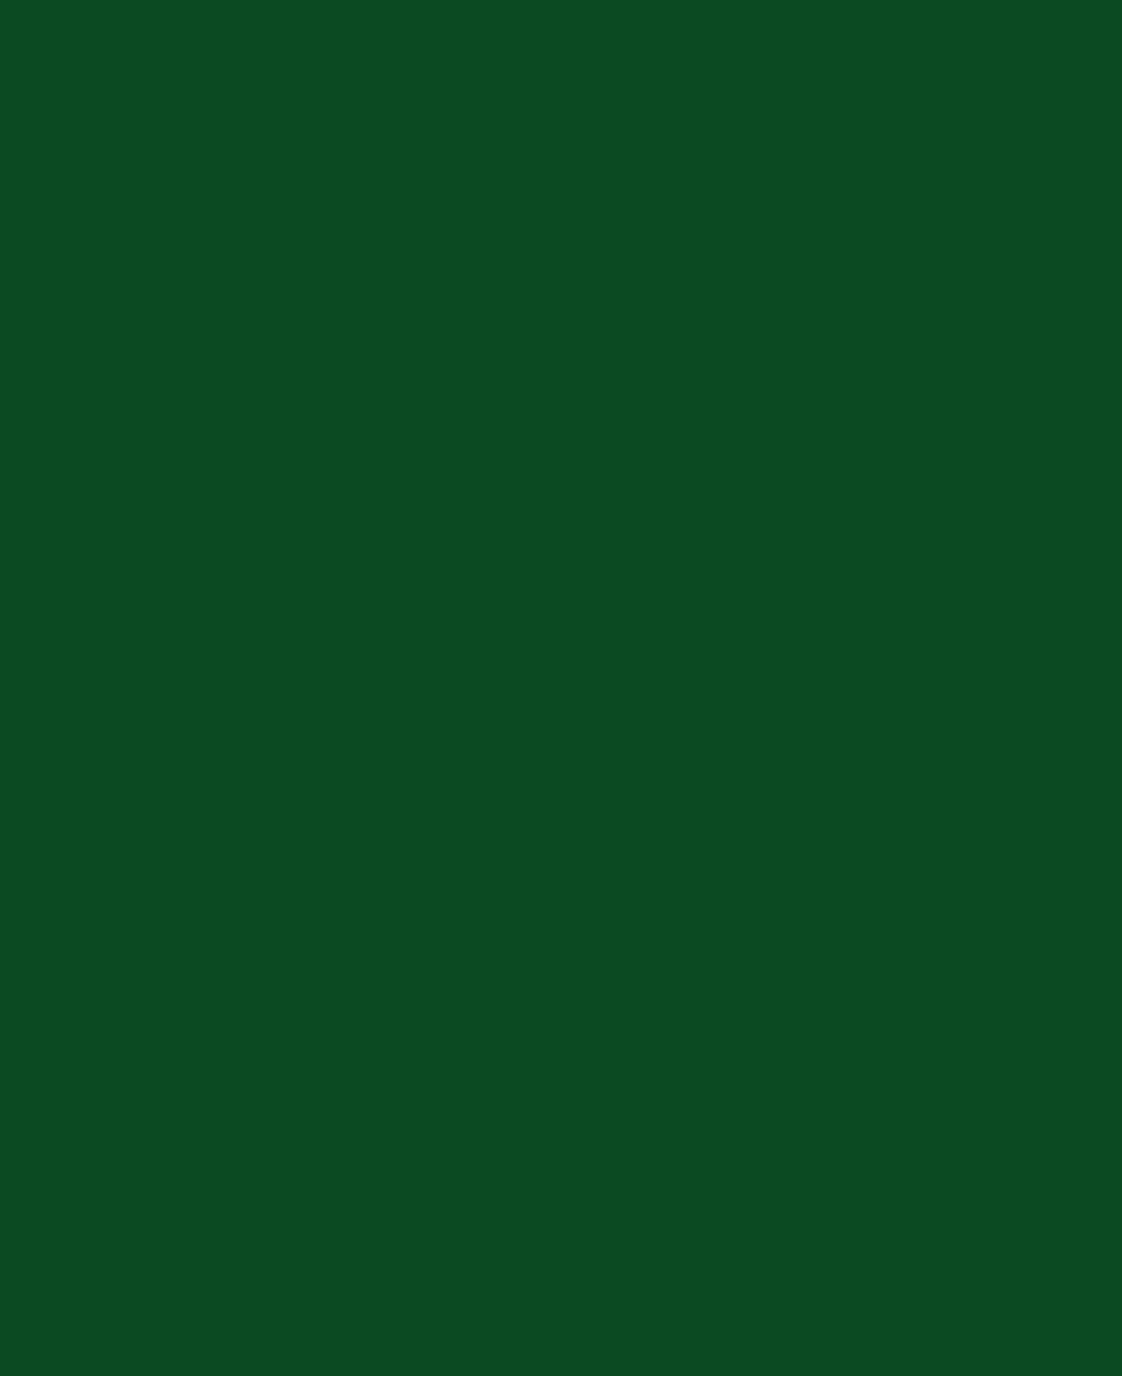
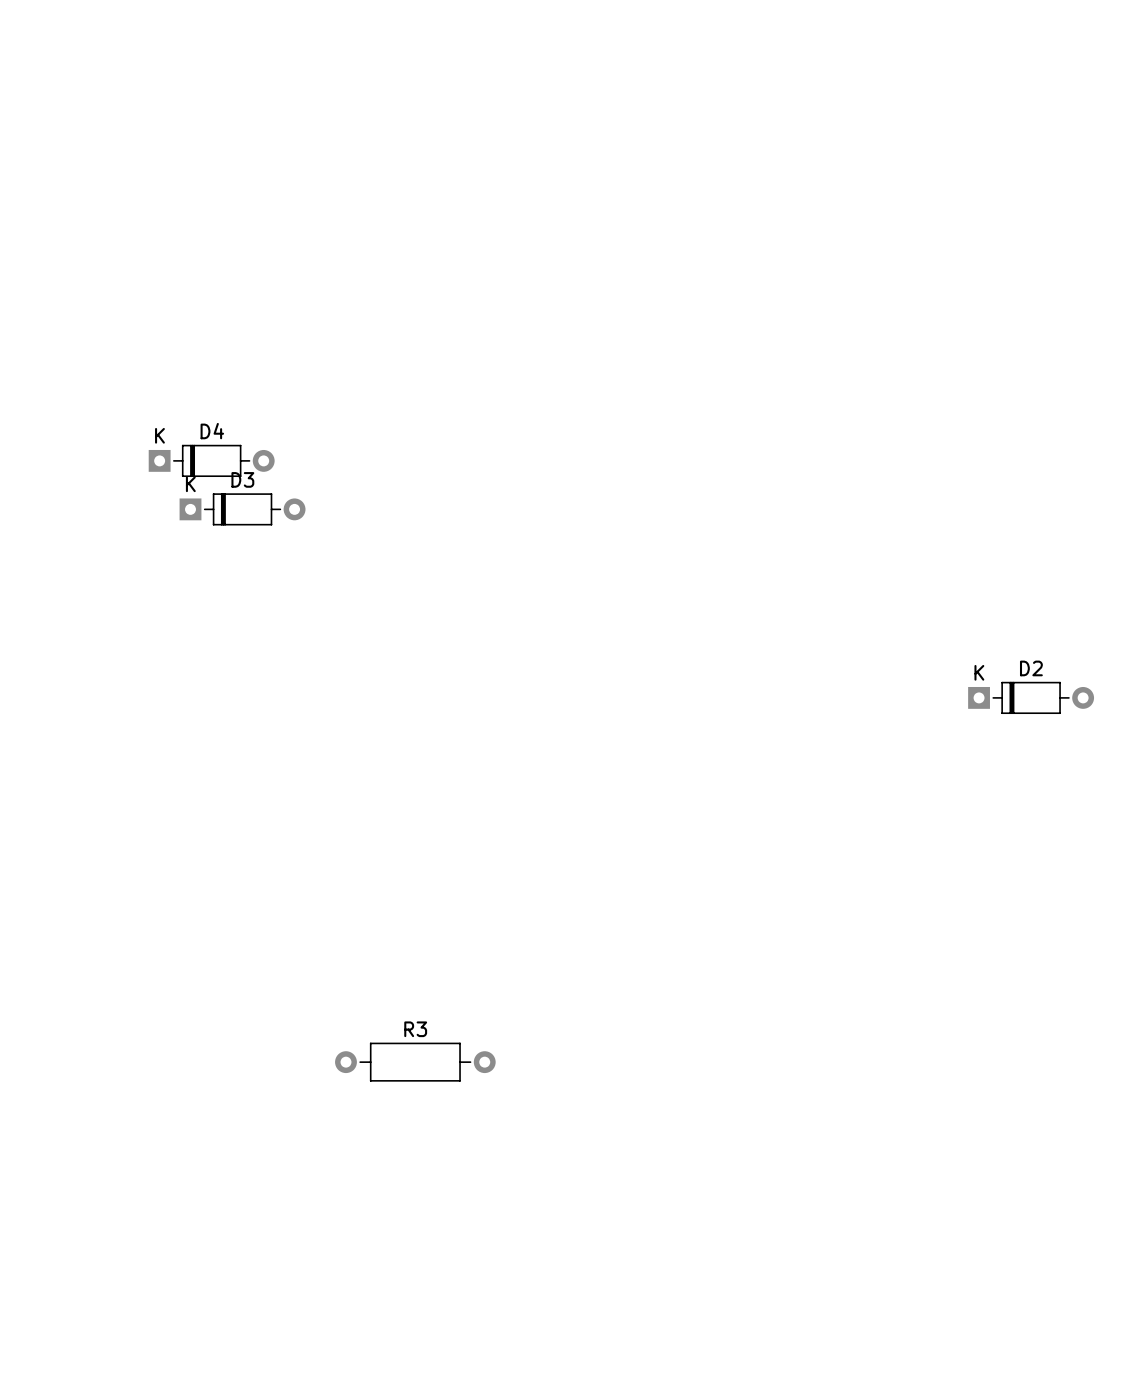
D4: none -> (211, 460)
D3: none -> (242, 509)
D2: none -> (1031, 697)
R3: none -> (415, 1062)

